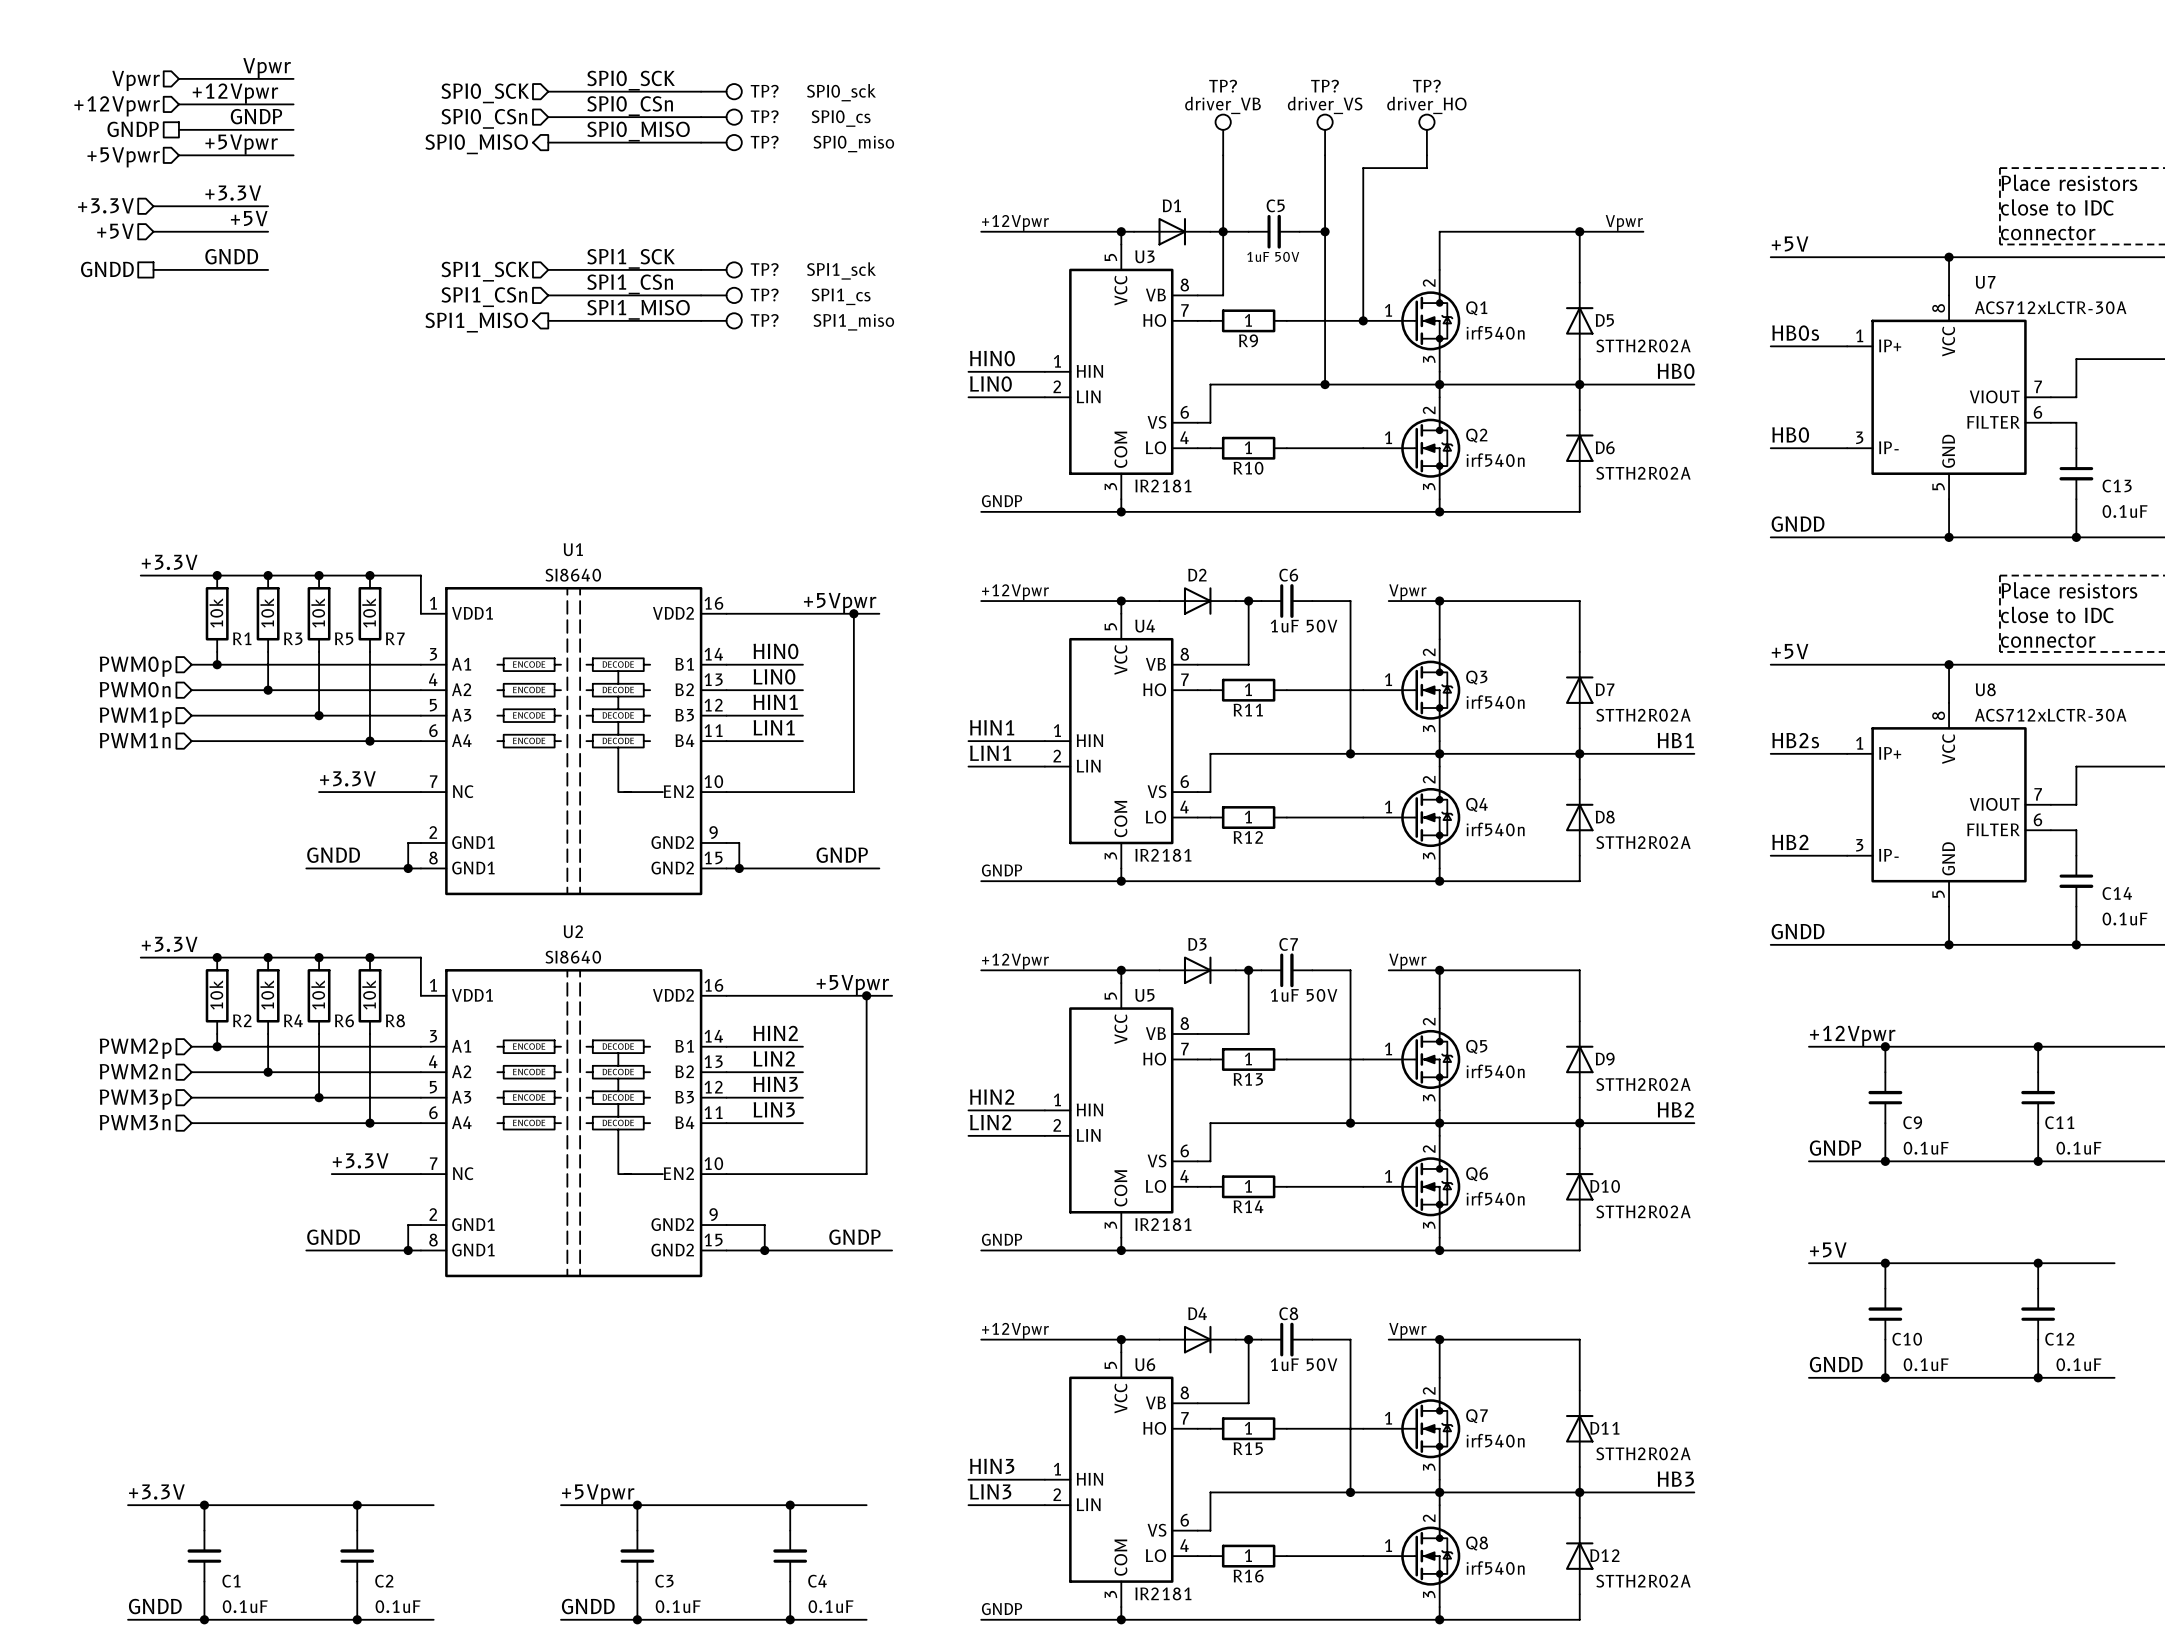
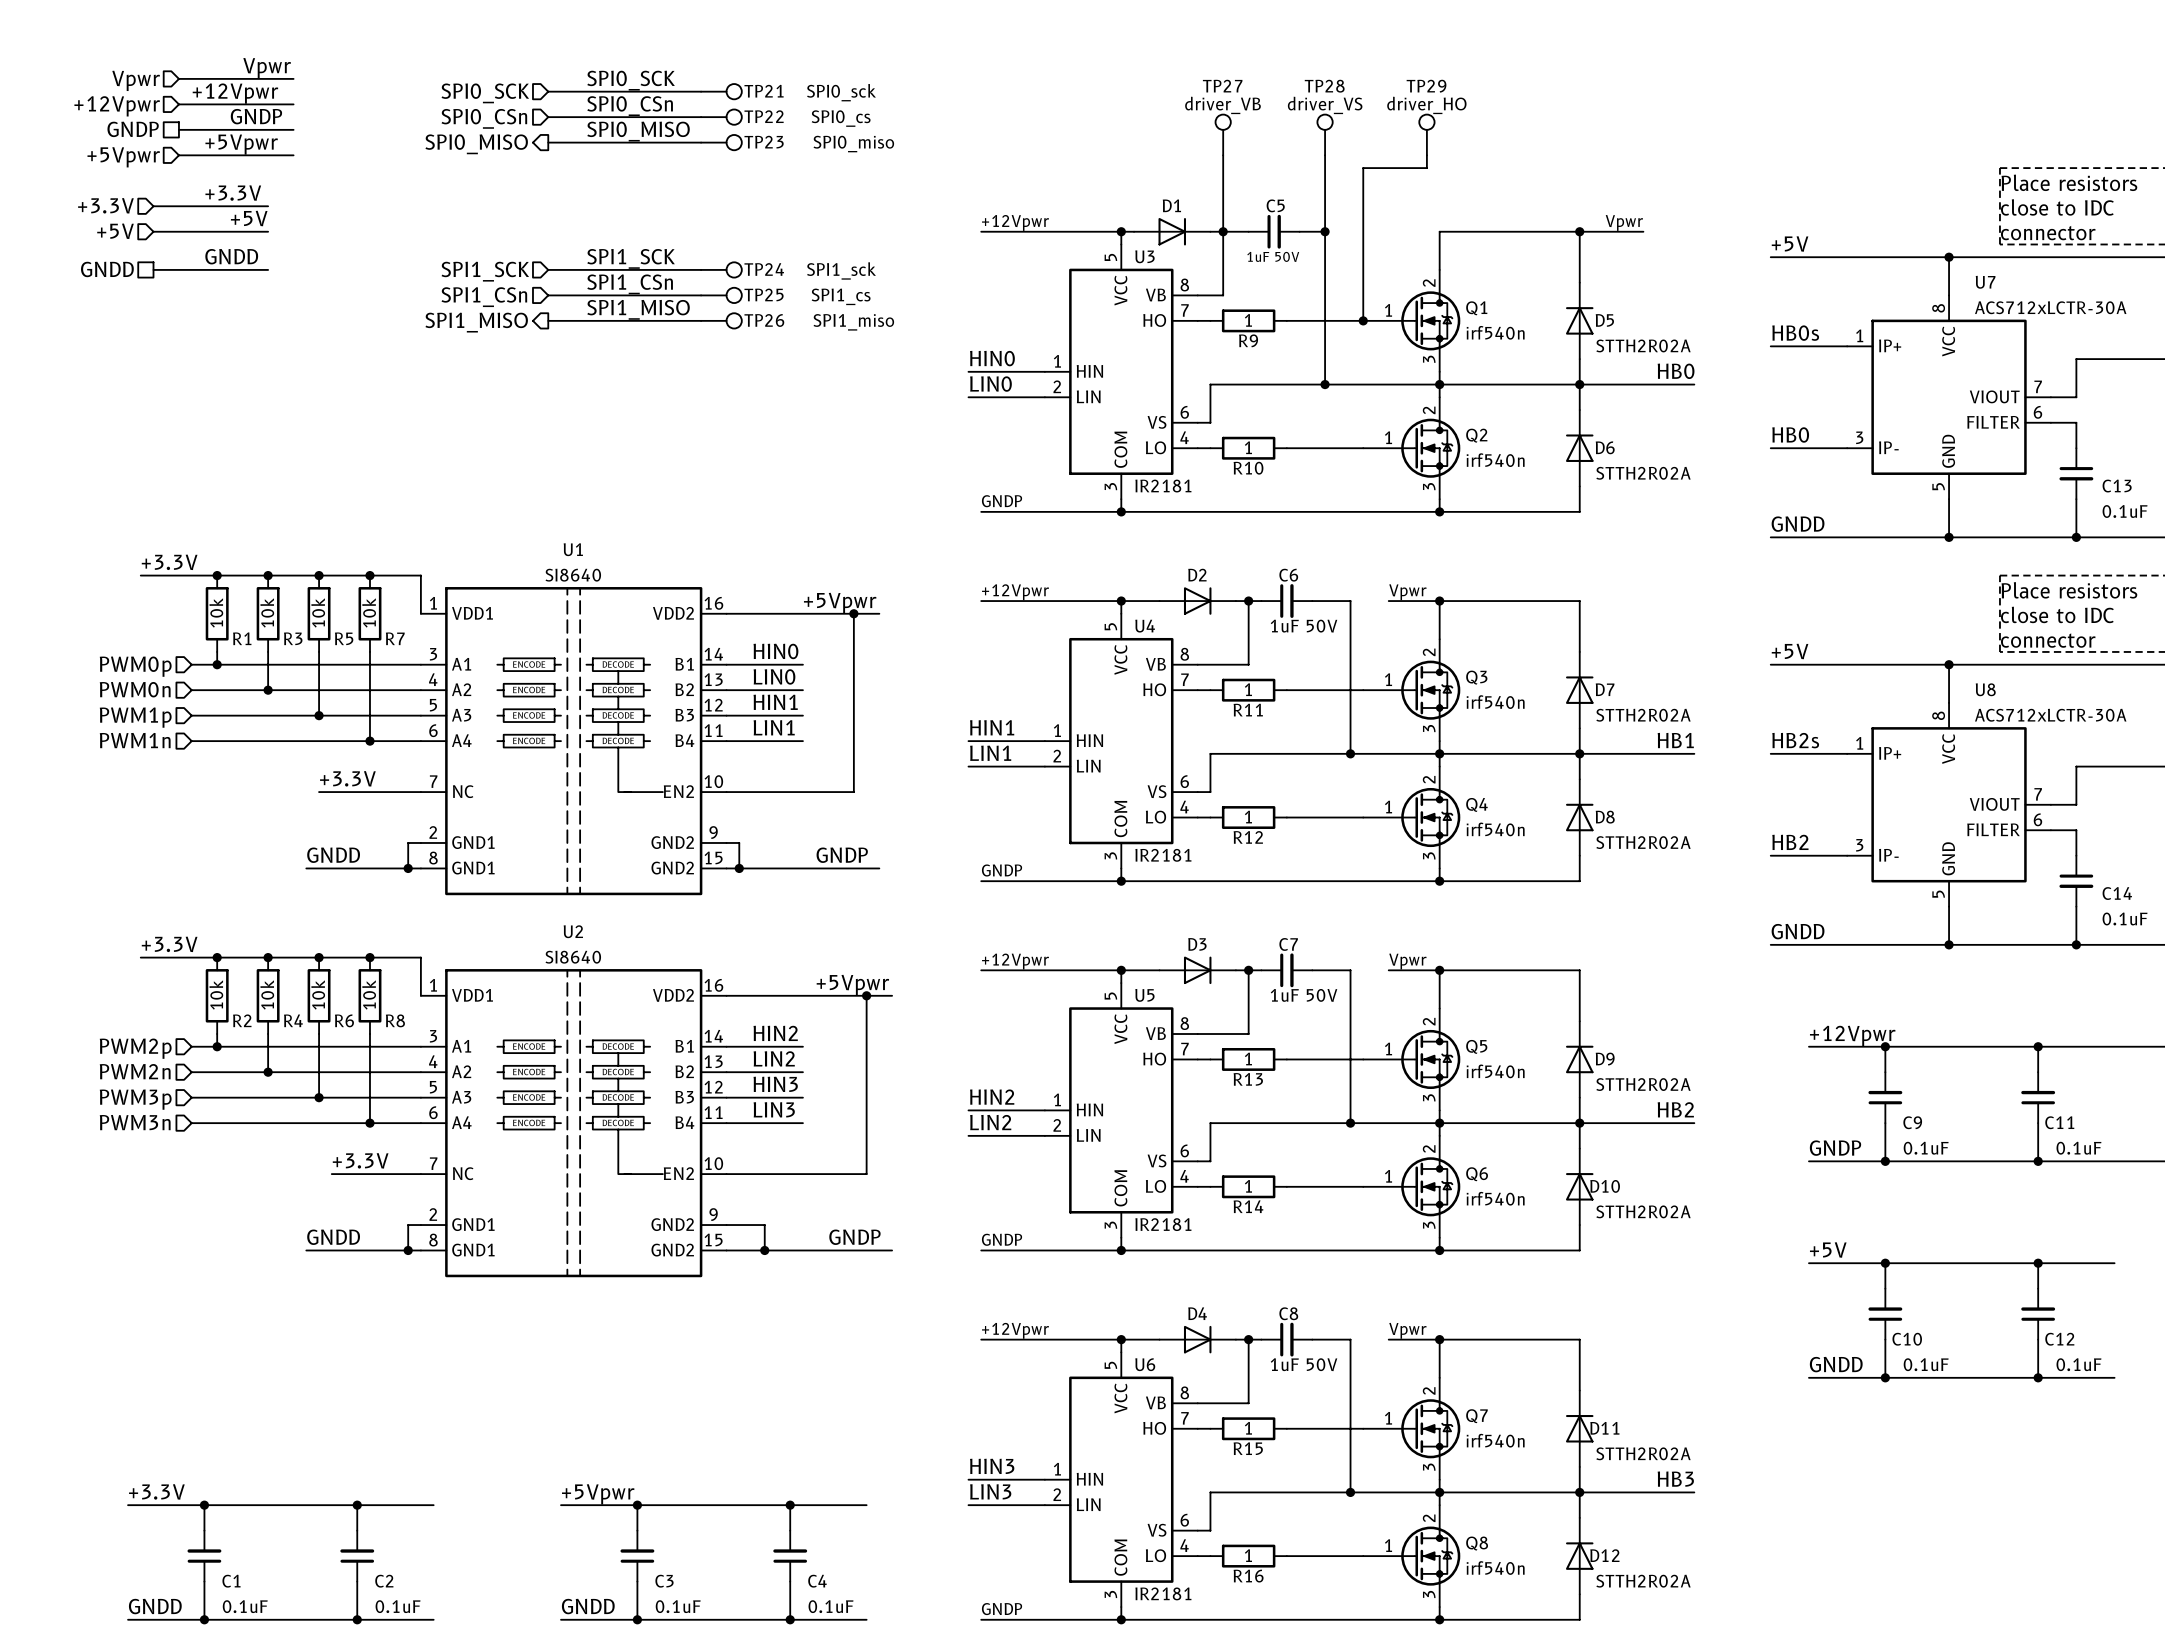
TP? name: TP? (1223, 86) -> TP27 (1222, 86)
TP? name: TP? (1324, 86) -> TP28 (1324, 86)
TP? name: TP? (1426, 86) -> TP29 (1426, 86)
TP? name: TP? (764, 91) -> TP21 (764, 91)
TP? name: TP? (764, 116) -> TP22 (764, 116)
TP? name: TP? (764, 142) -> TP23 (764, 142)
TP? name: TP? (764, 269) -> TP24 (764, 269)
TP? name: TP? (764, 295) -> TP25 (764, 294)
TP? name: TP? (764, 320) -> TP26 (764, 320)

